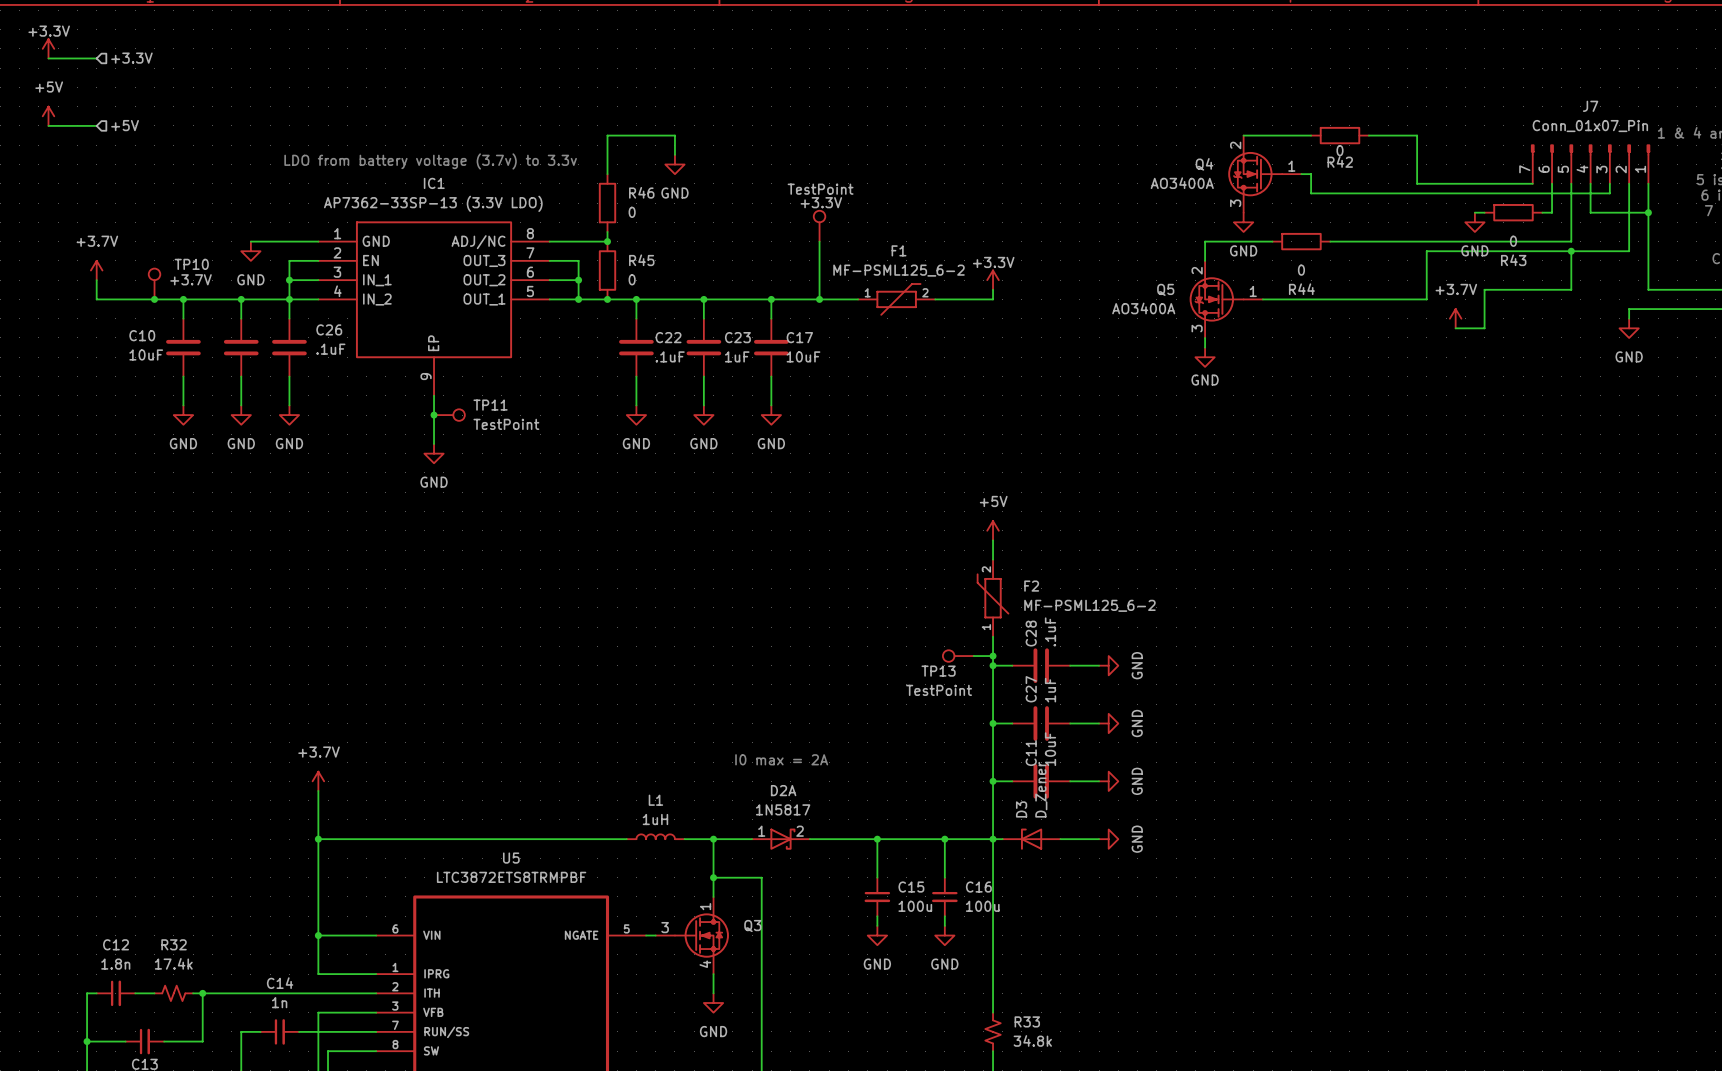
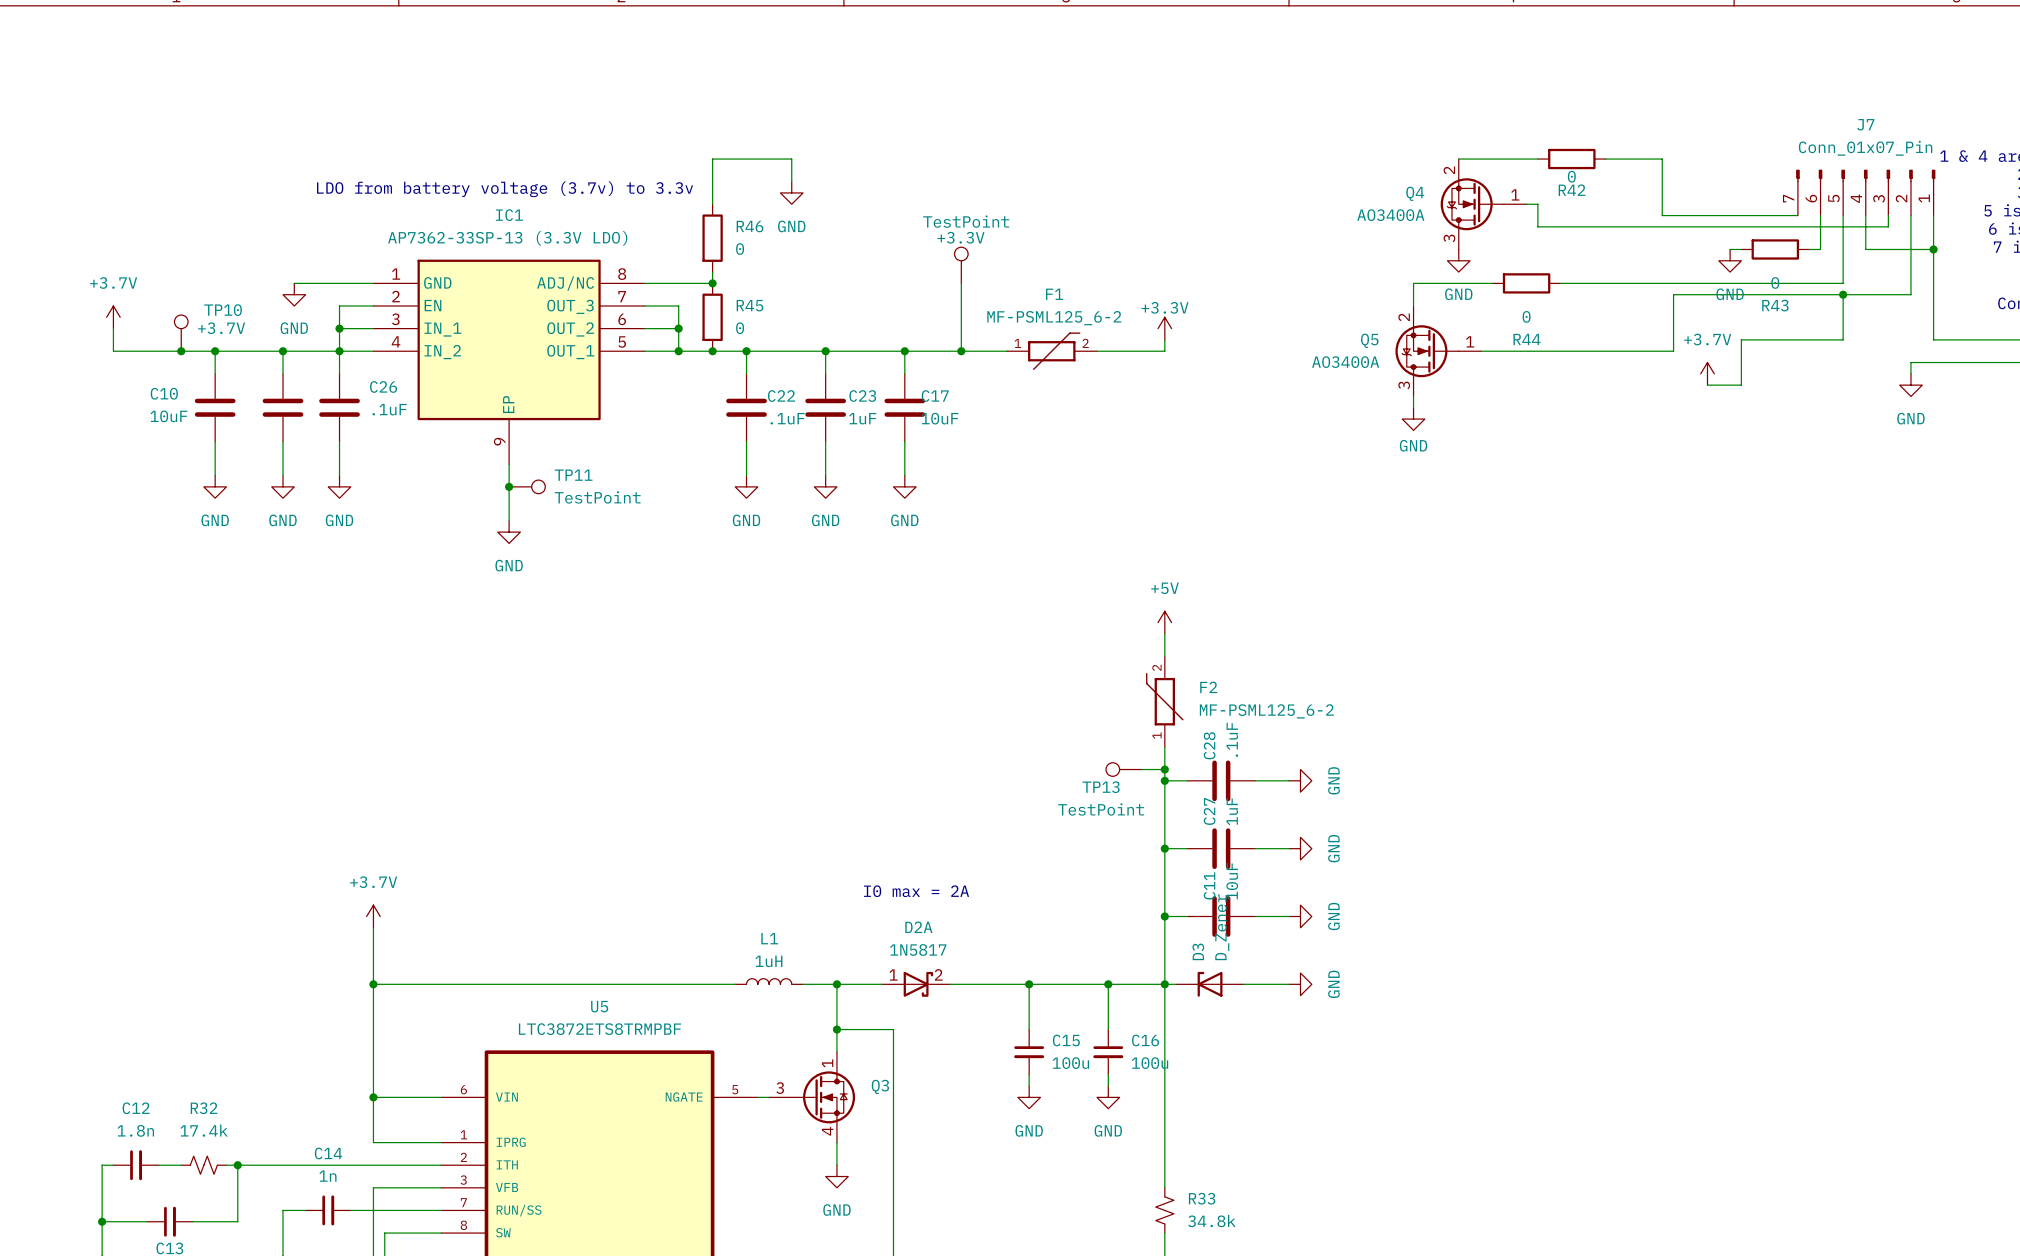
power symbol: +3.3V (48, 48) -> none
wire: (48, 58) (96, 58) -> none
hierarchical label: +3.3V (131, 58) -> none
power symbol: +5V (48, 116) -> none
wire: (48, 125) (96, 125) -> none
hierarchical label: +5V (125, 125) -> none

